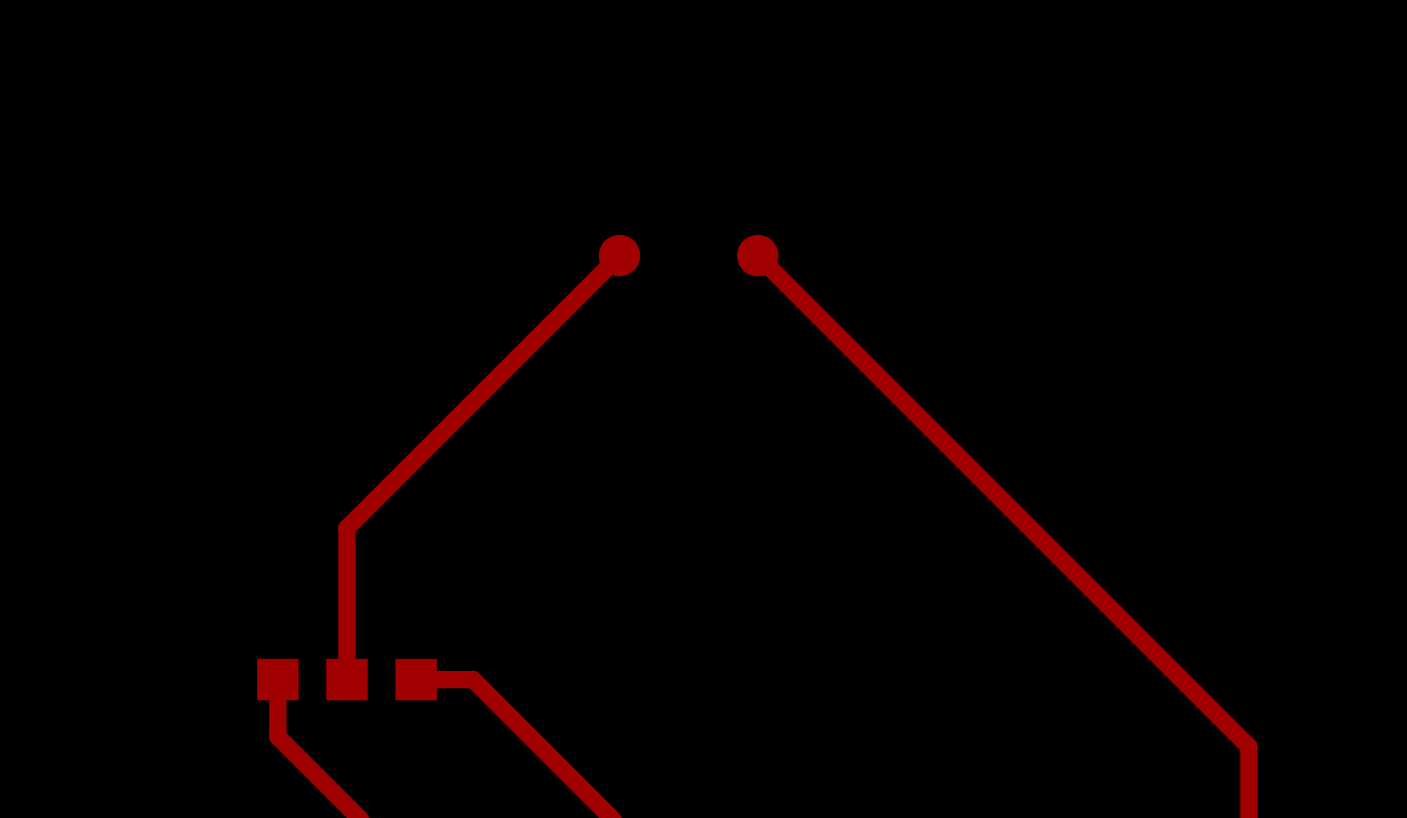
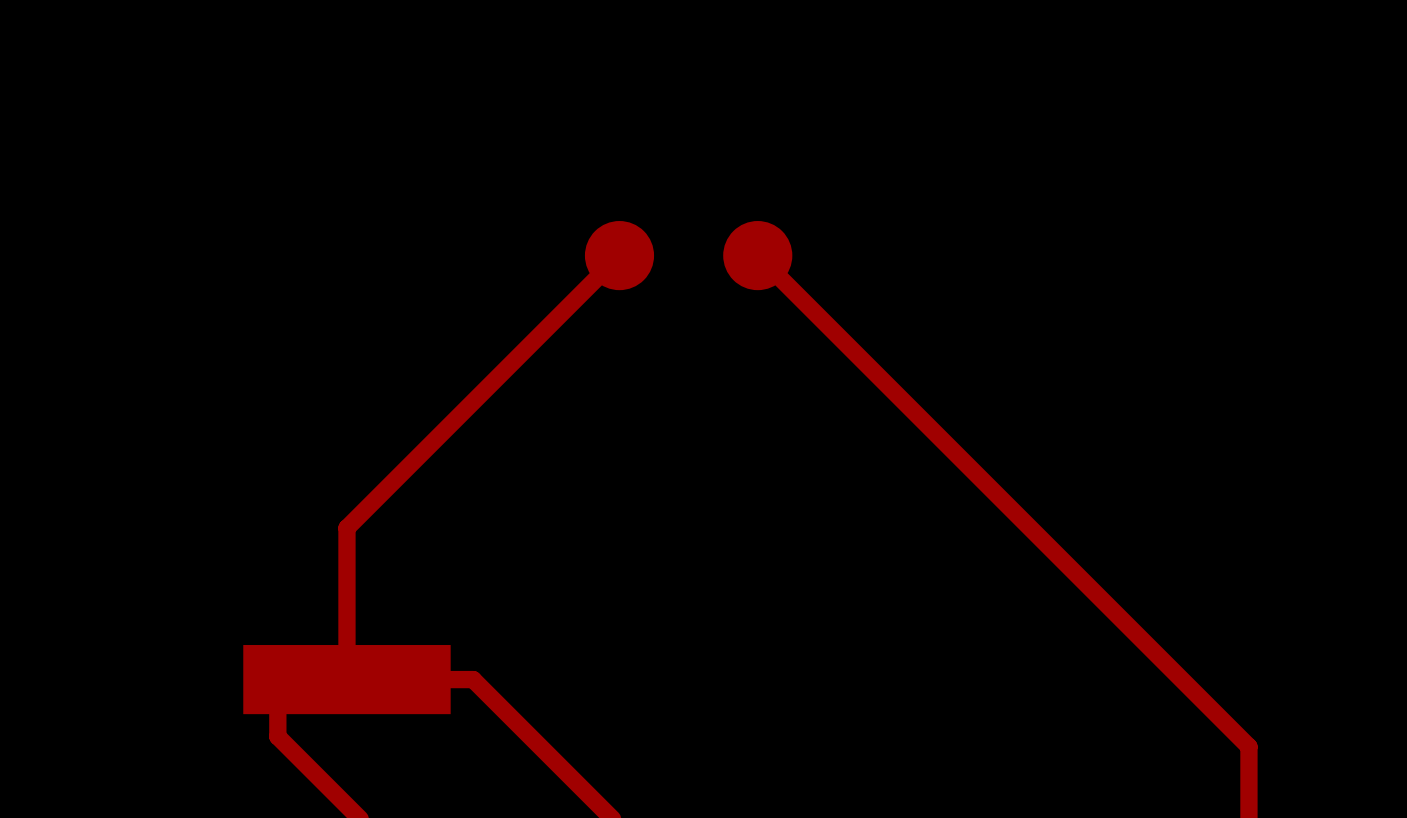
part footprint: [598, 234, 779, 277] -> [584, 221, 793, 291]
part footprint: [257, 658, 437, 701] -> [243, 645, 451, 715]

